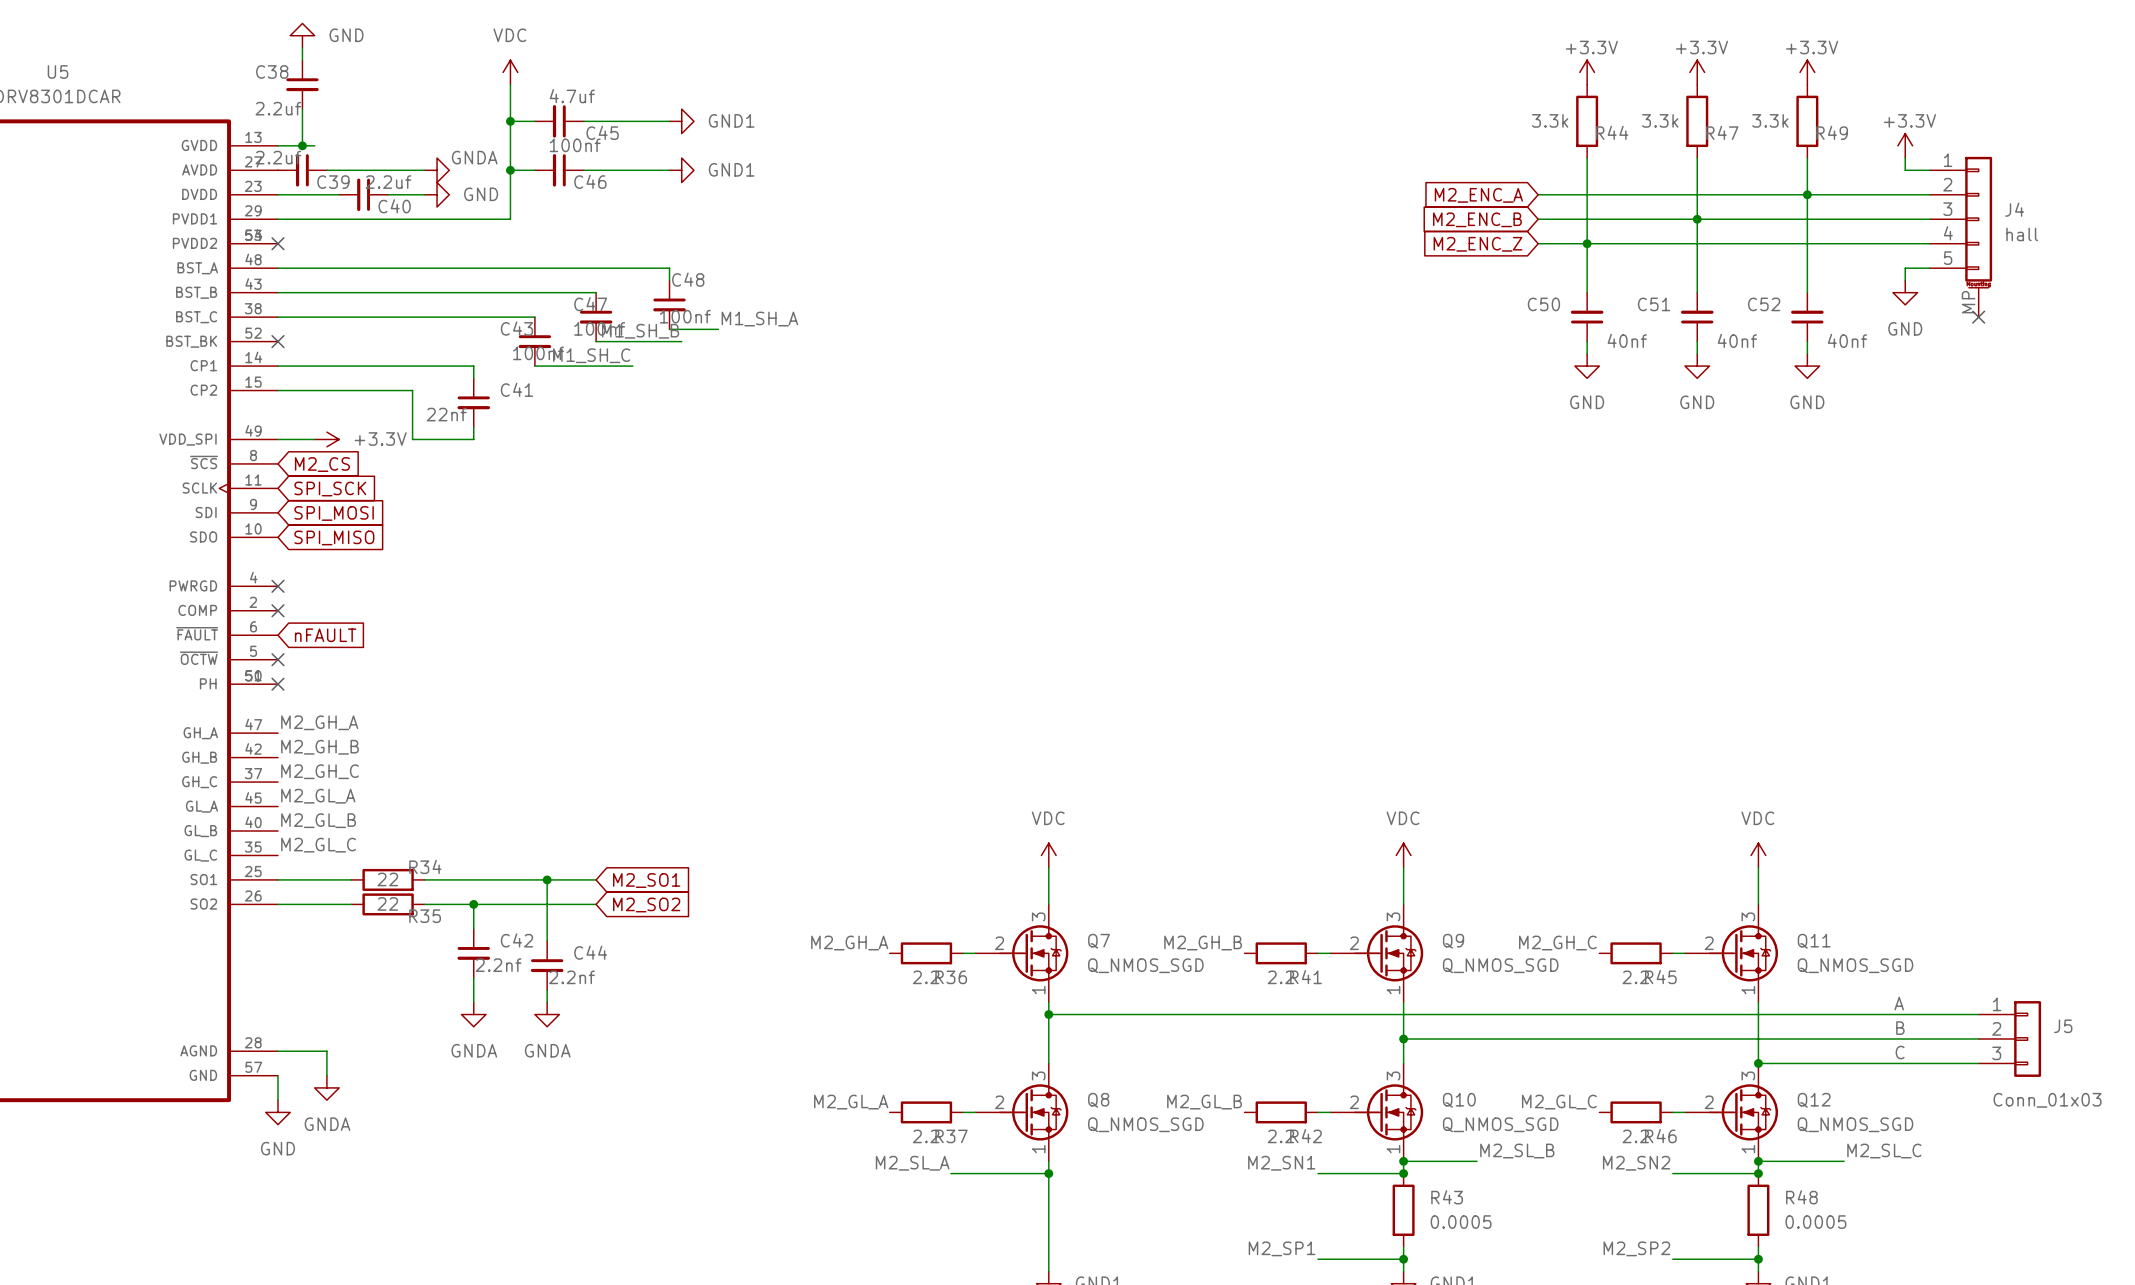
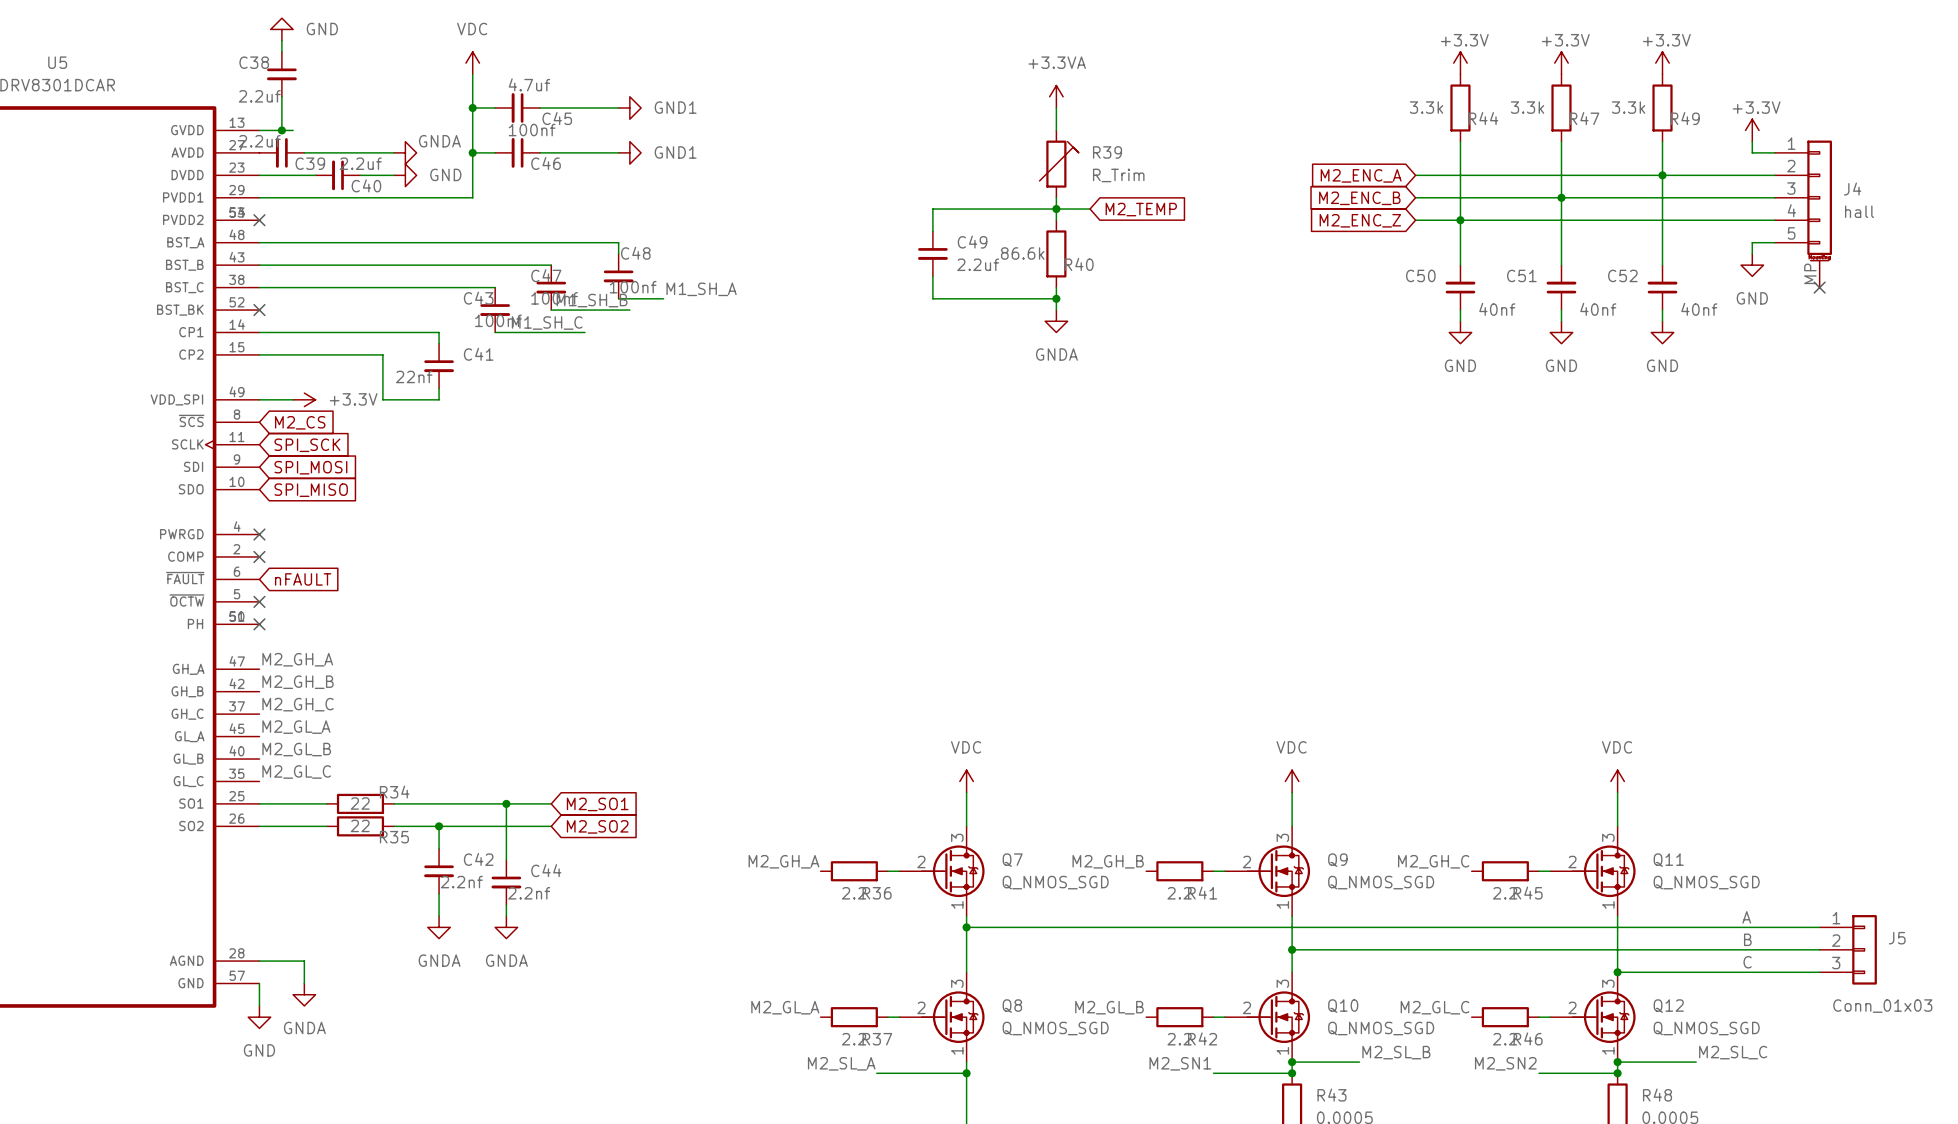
power symbol: none -> +3.3VA (1056, 96)
wire: none -> (1056, 108) (1056, 130)
R39: none -> R_Trim (1059, 164)
wire: none -> (1056, 197) (1056, 220)
junction: none -> (1056, 209)
wire: none -> (1090, 209) (932, 209) (932, 231)
global label: none -> M2_TEMP (1141, 209)
C49: none -> 2.2uf (932, 253)
R40: none -> 86.6k (1056, 253)
wire: none -> (932, 276) (932, 298) (1056, 298)
wire: none -> (1056, 287) (1056, 310)
junction: none -> (1056, 298)
power symbol: none -> GNDA (1056, 321)

